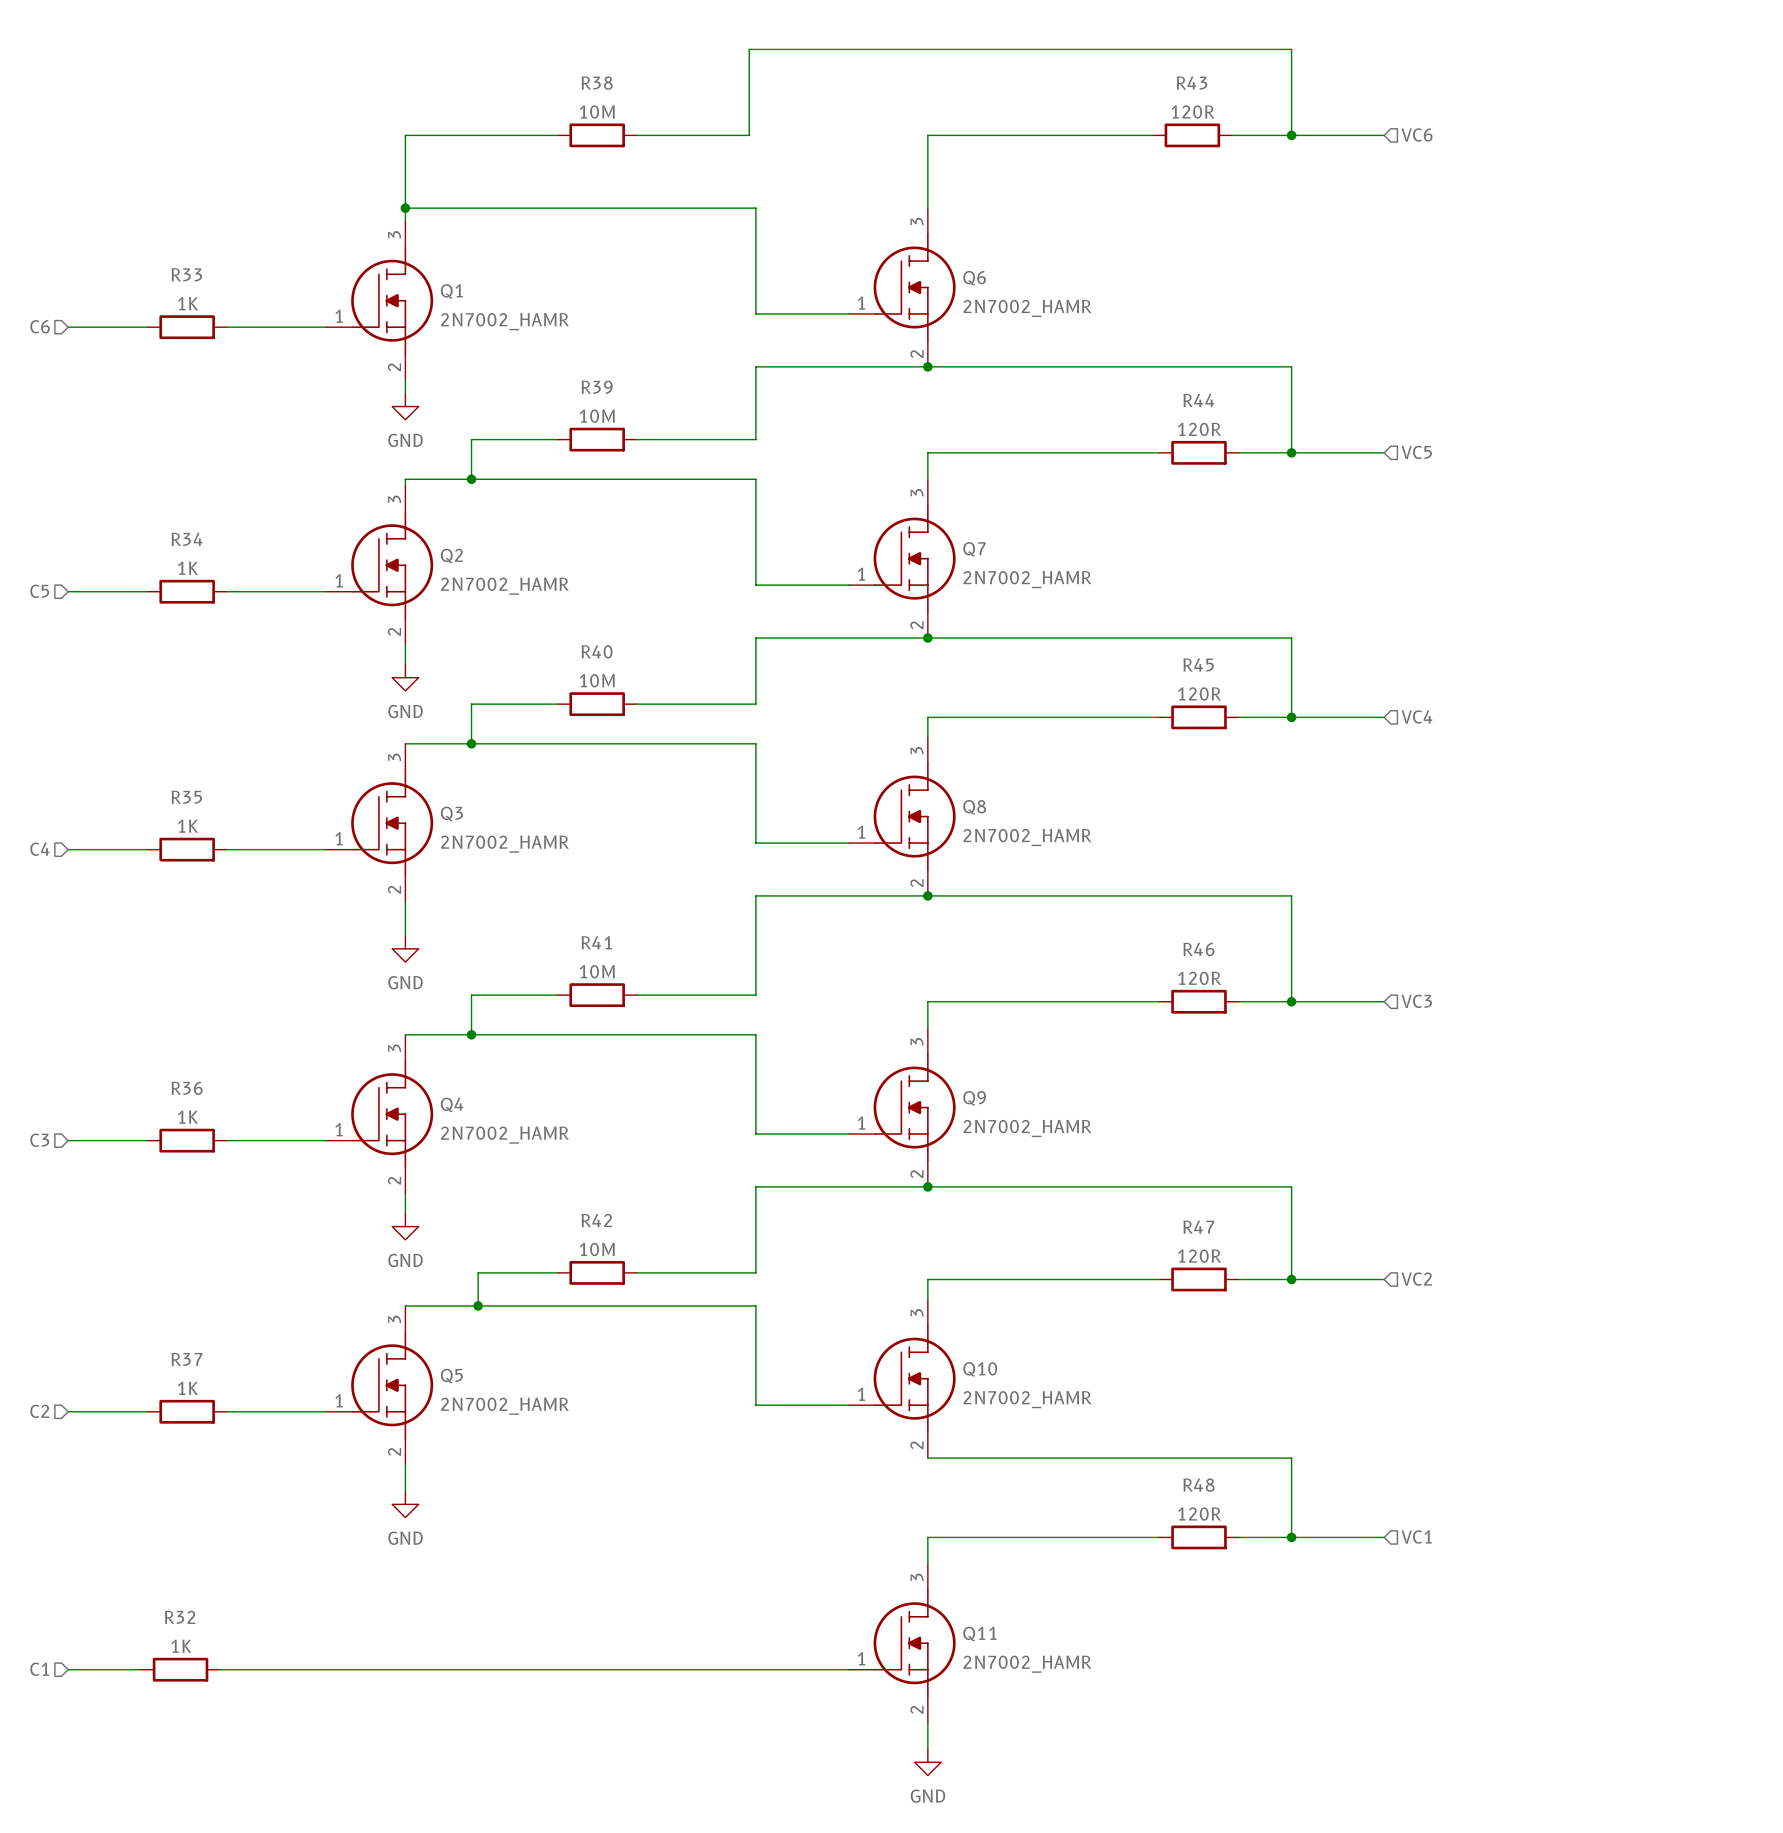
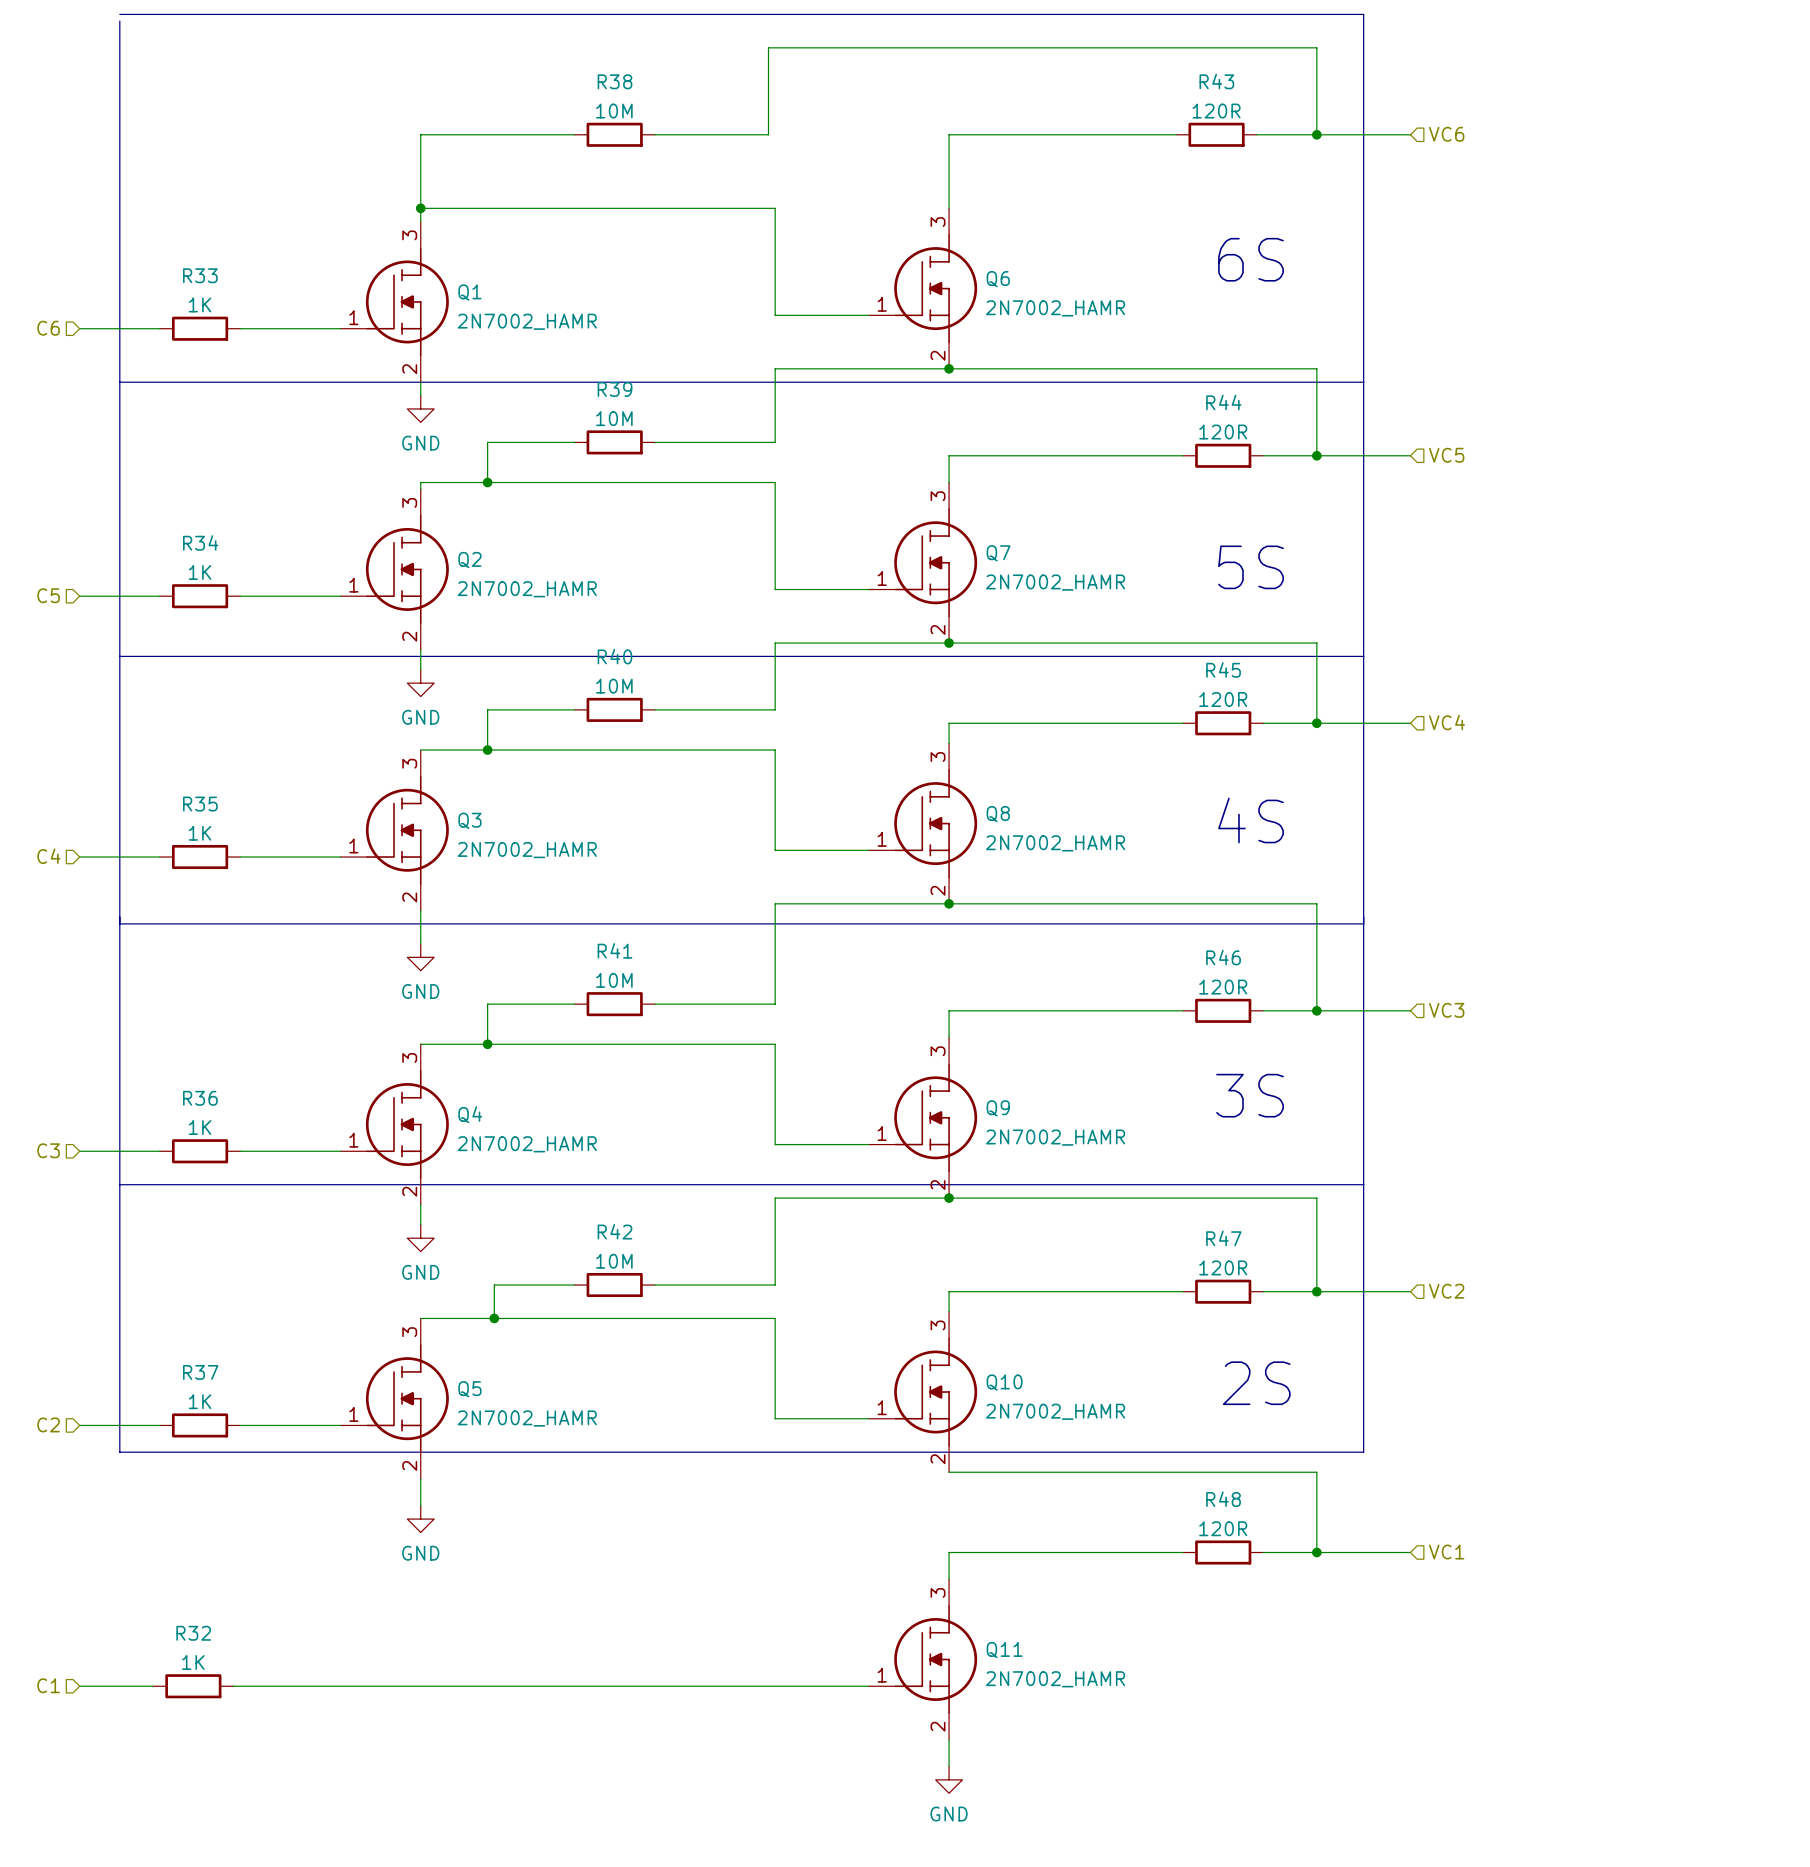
line: none -> (119, 14) (1363, 14) (1363, 1452) (119, 1452) (119, 21)
text: none -> 6S (1251, 259)
line: none -> (119, 382) (1363, 382)
text: none -> 5S (1251, 567)
line: none -> (119, 656) (1363, 656)
text: none -> 4S (1251, 820)
line: none -> (119, 923) (1363, 923)
text: none -> 3S (1250, 1095)
line: none -> (119, 1184) (1363, 1184)
text: none -> 2S (1256, 1383)

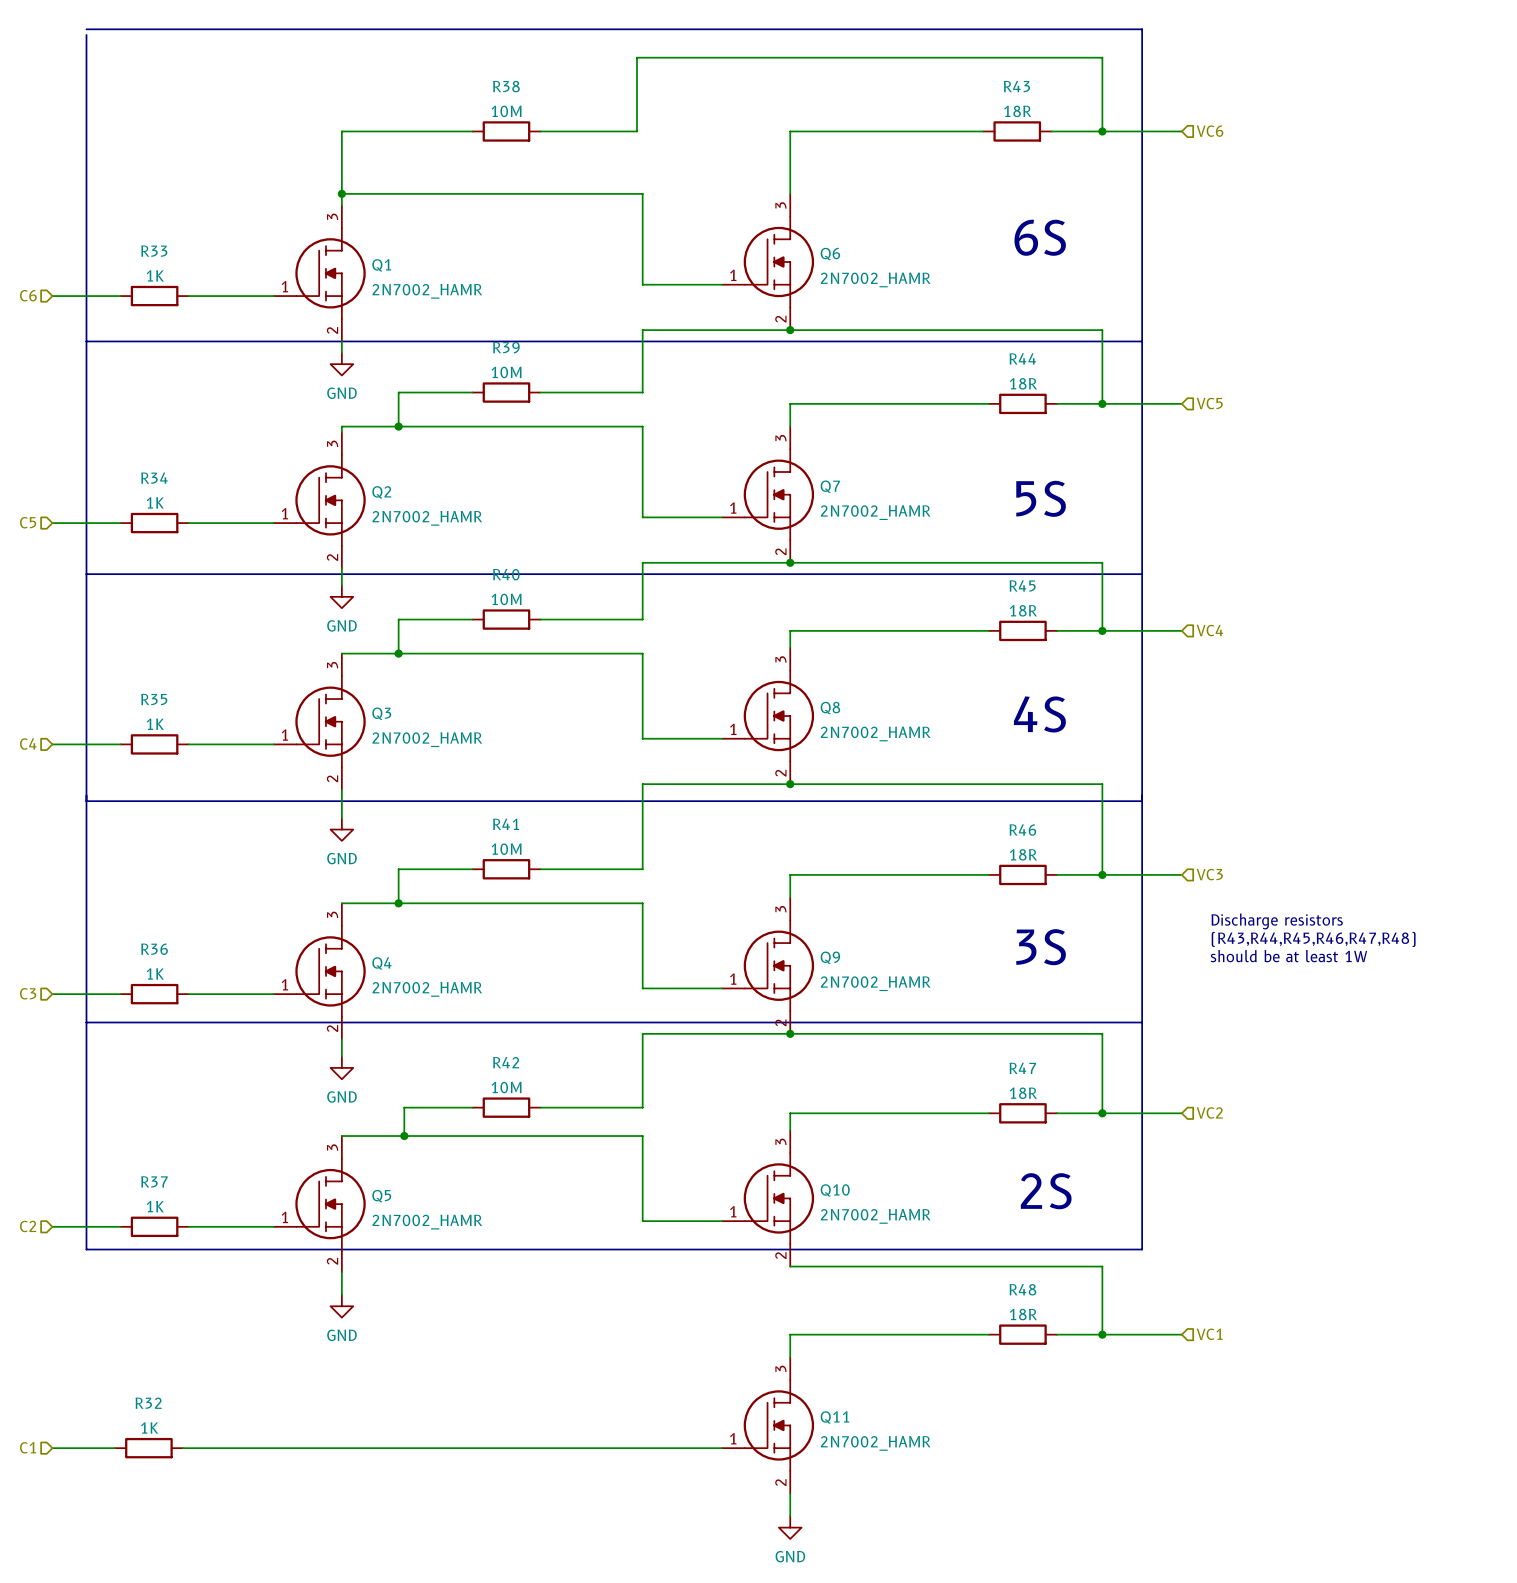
R43 value: 120R (1216, 111) -> 18R (1017, 111)
R44 value: 120R (1223, 432) -> 18R (1023, 383)
R45 value: 120R (1223, 699) -> 18R (1023, 610)
R46 value: 120R (1223, 987) -> 18R (1023, 854)
text: none -> Discharge resistors (1277, 921)
text: none -> (R43,R44,R45,R46,R47,R48) (1313, 939)
text: none -> should be at least 1W (1288, 956)
R47 value: 120R (1223, 1267) -> 18R (1023, 1093)
R48 value: 120R (1223, 1528) -> 18R (1023, 1314)

